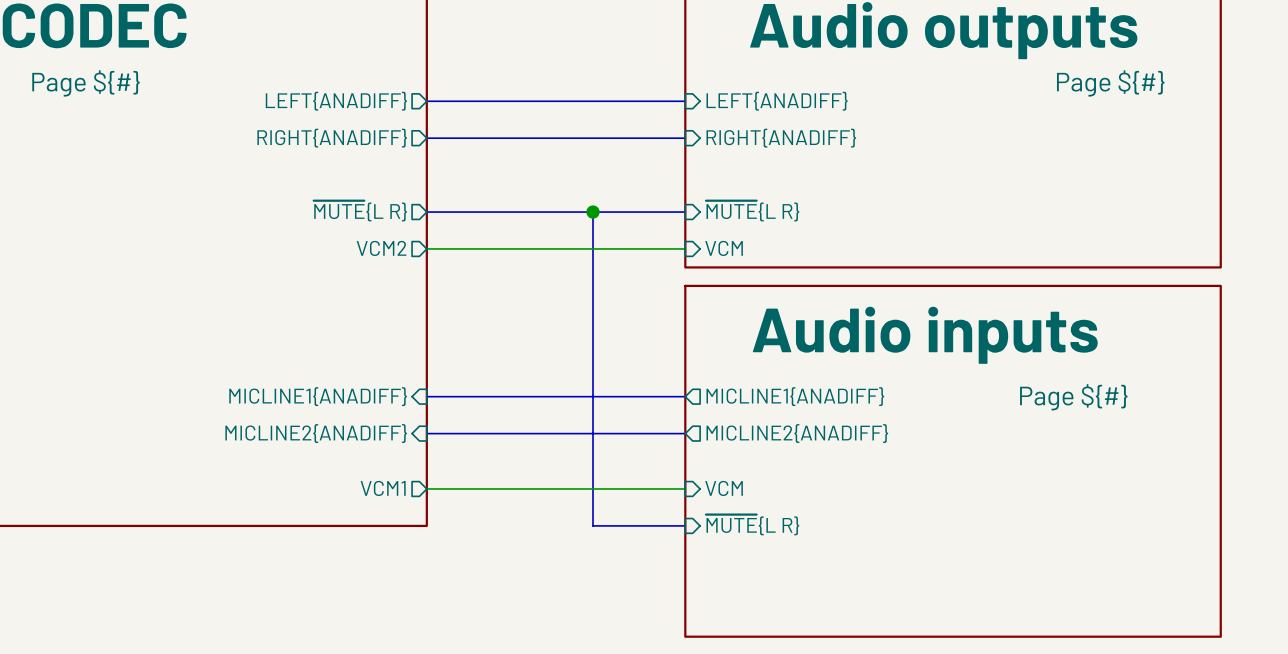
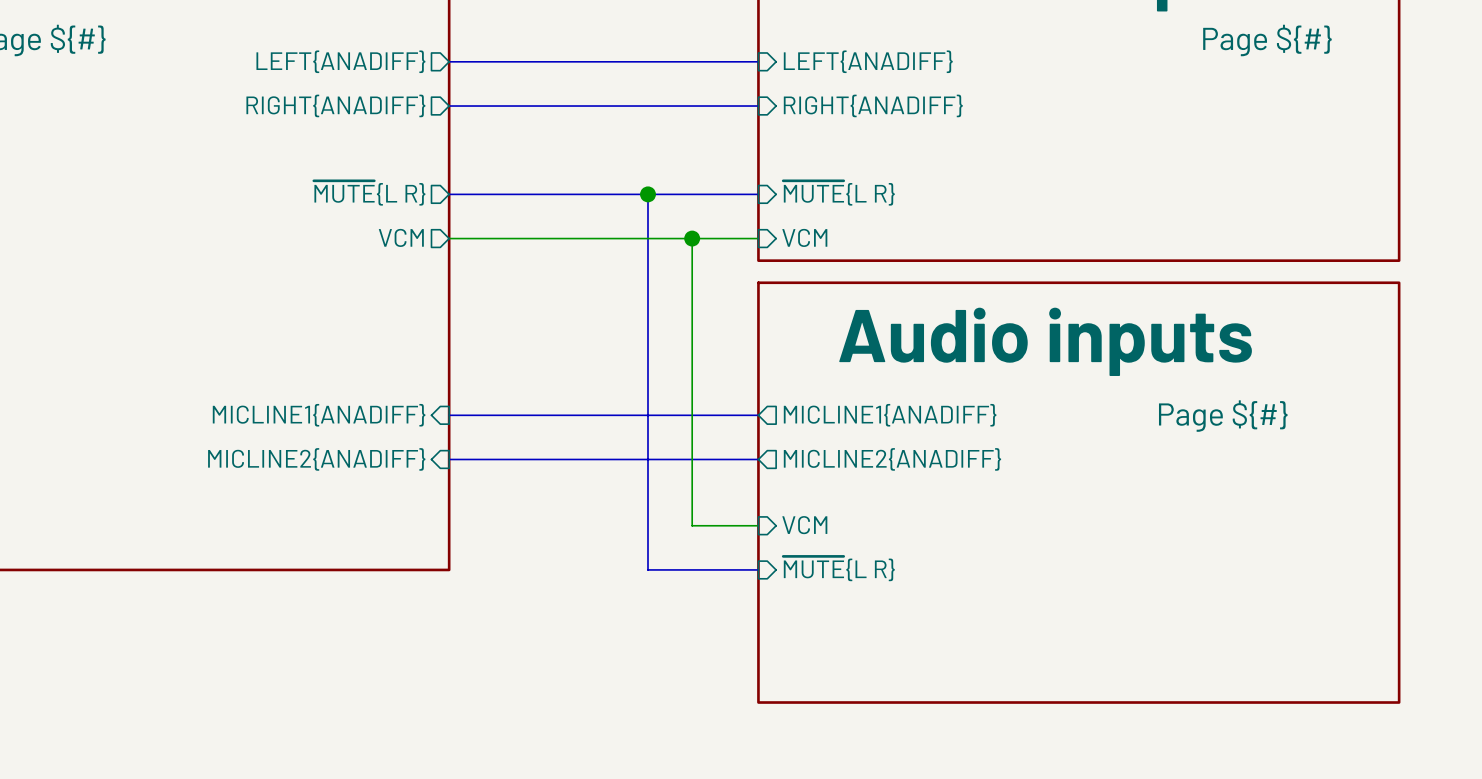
sheet pin: VCM2 (381, 248) -> VCM (401, 237)
junction: none -> (692, 238)
sheet pin: VCM1 (383, 488) -> none
wire: (426, 488) (629, 488) -> (692, 238) (692, 525)

